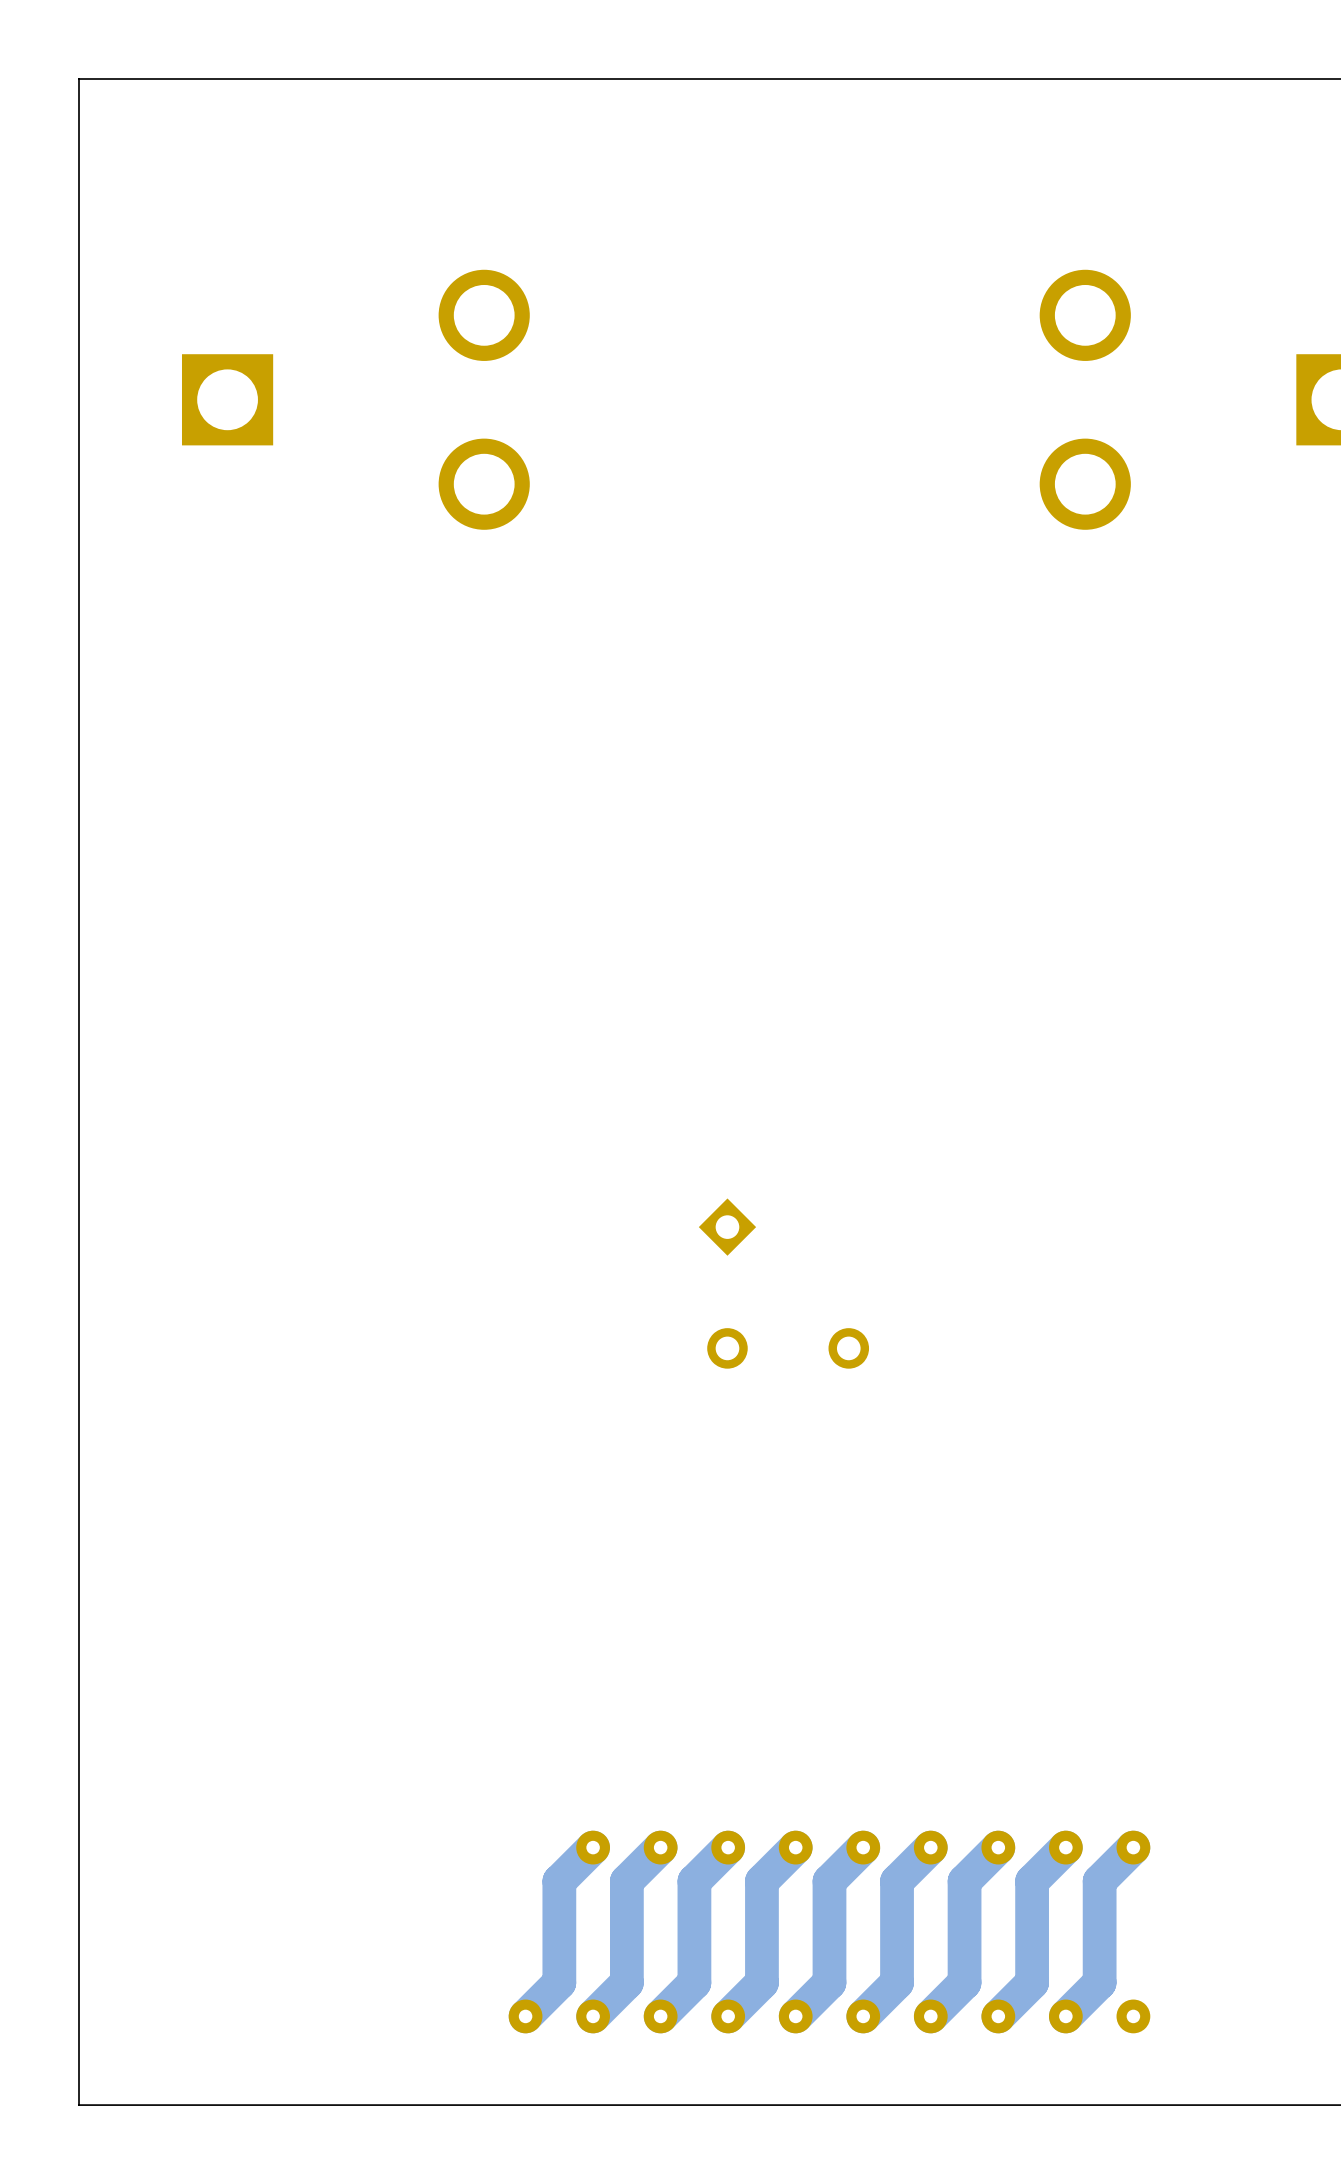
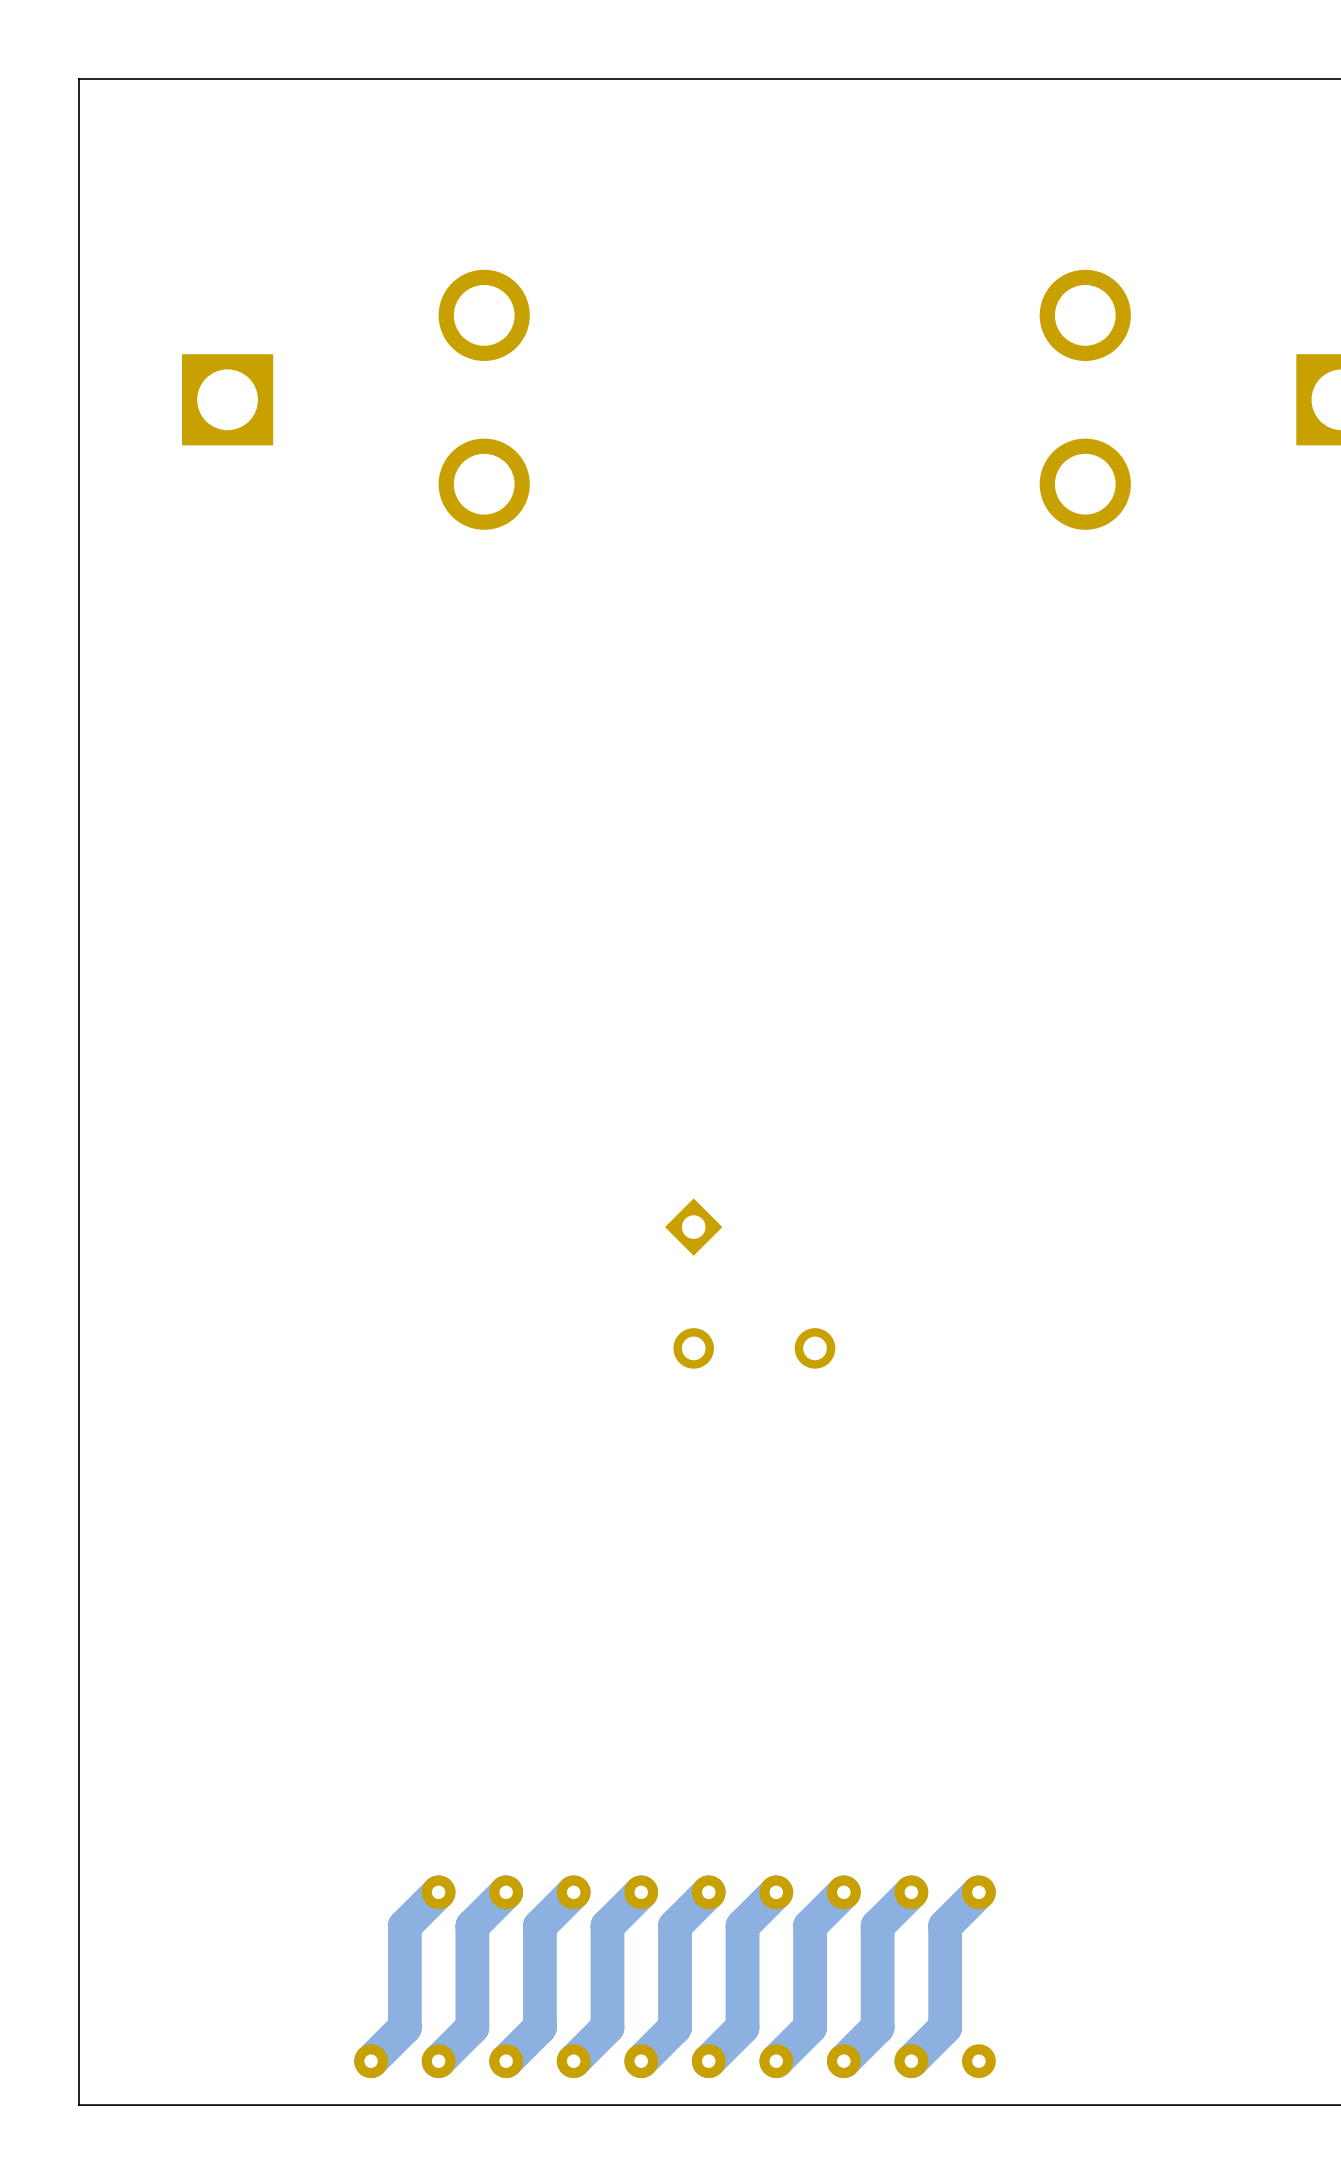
part position: (783, 1283) -> (750, 1283)
part position: (829, 1932) -> (675, 1976)

